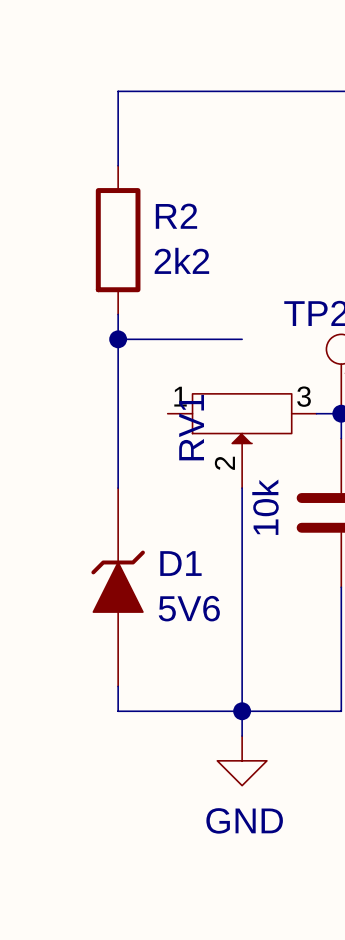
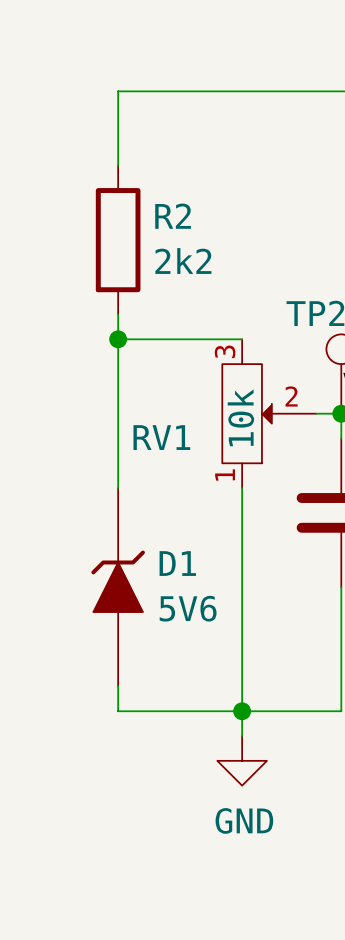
RV1 rotation: 0° (242, 418) -> 90° counterclockwise (247, 413)
RV1 name position: RV1 (191, 427) -> RV1 (161, 437)
RV1 value position: 10k (265, 507) -> 10k (240, 417)

